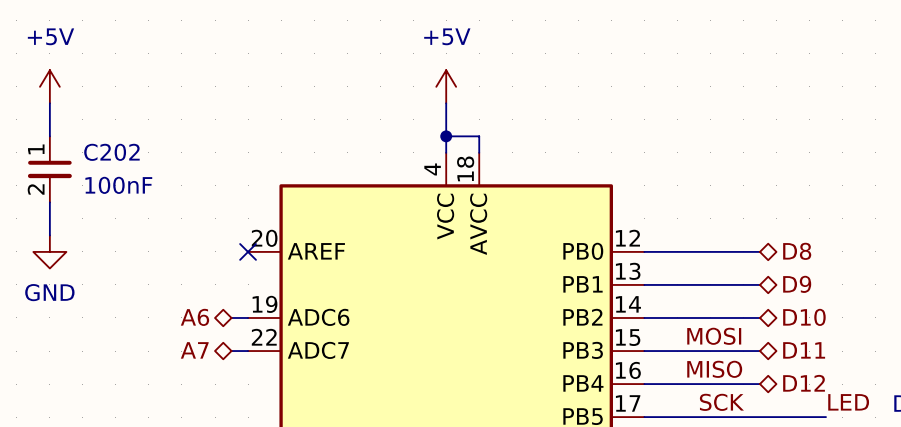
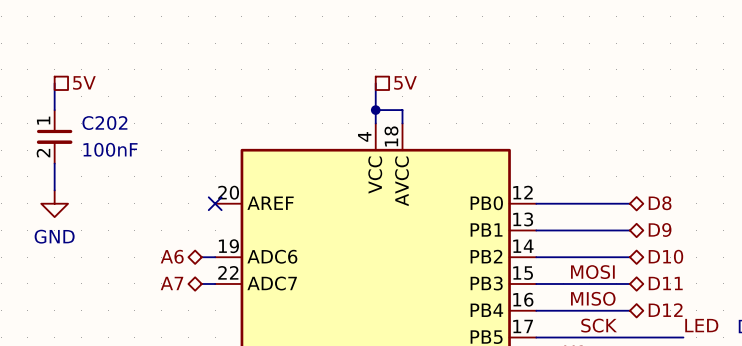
power symbol: +5V (49, 86) -> none
power symbol: +5V (446, 86) -> none
hierarchical label: none -> 5V (84, 82)
hierarchical label: none -> 5V (405, 82)

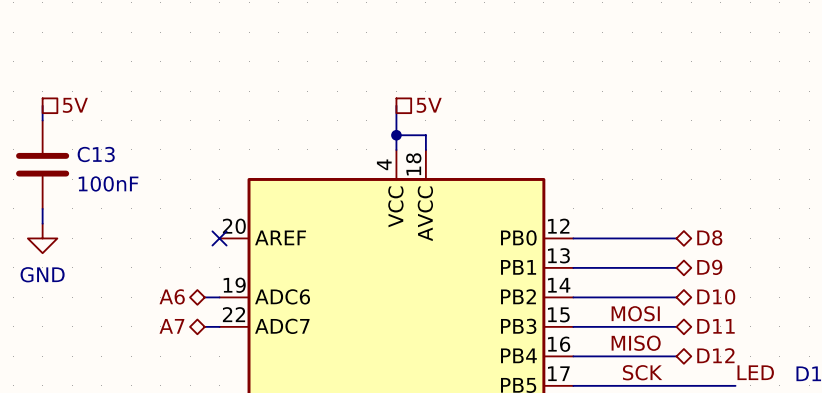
C202: 100nF (54, 136) -> none
C13: none -> 100nF (42, 164)

